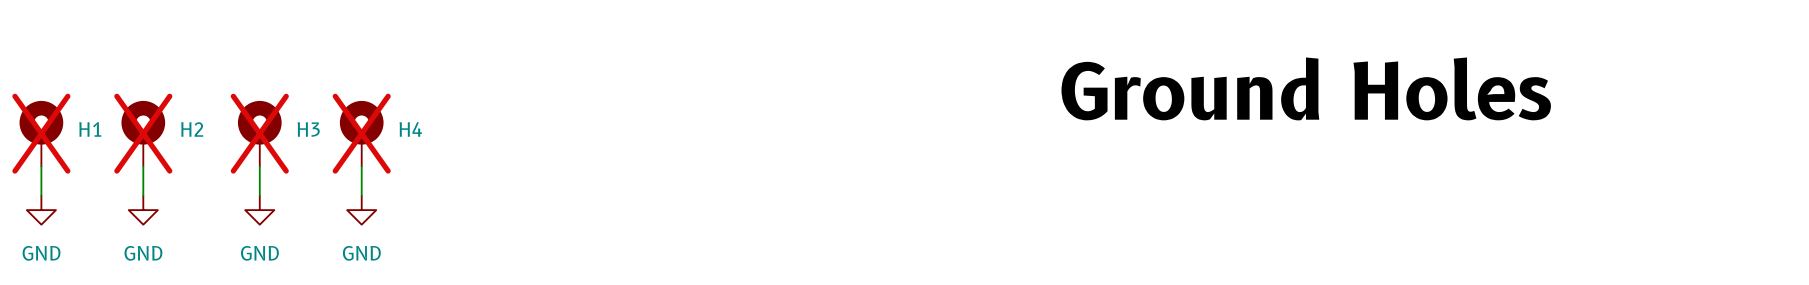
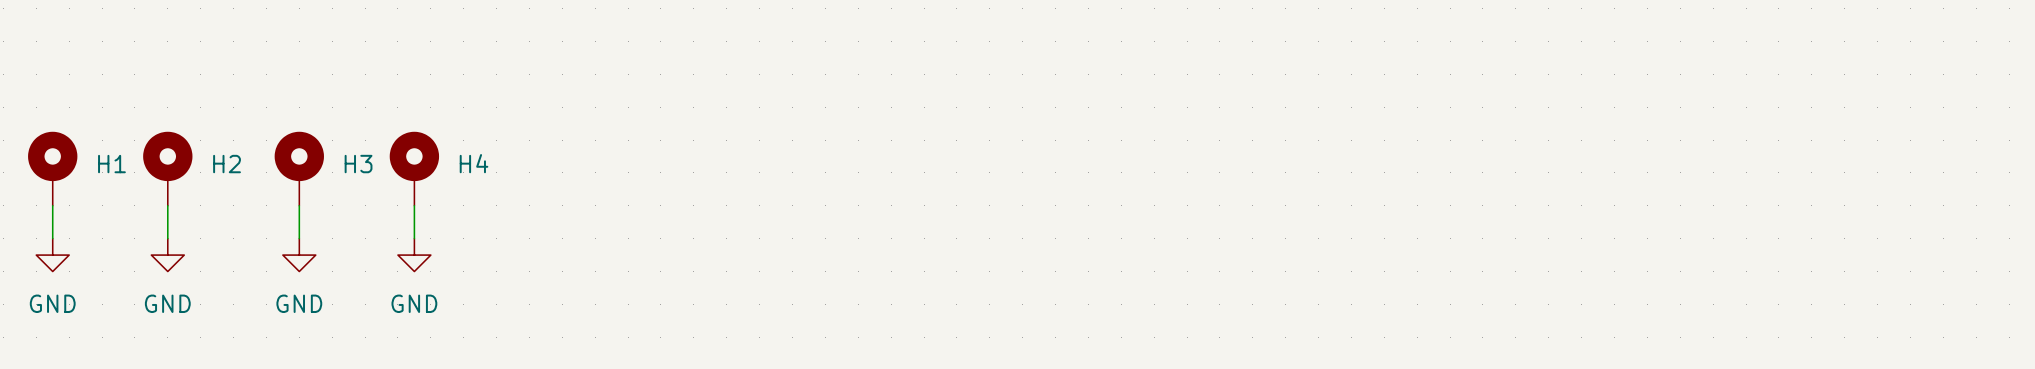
label: Ground Holes (1306, 88) -> none
H1 do-not-place cross: (41, 133) -> none
H2 do-not-place cross: (143, 133) -> none
H3 do-not-place cross: (259, 133) -> none
H4 do-not-place cross: (361, 133) -> none

